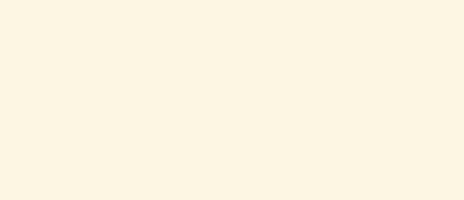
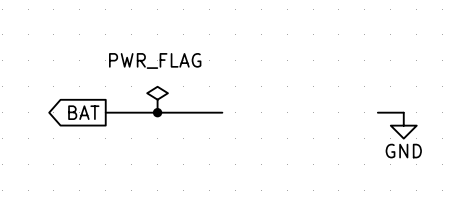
power symbol: none -> PWR_FLAG (157, 99)
global label: none -> BAT (83, 112)
wire: none -> (105, 112) (222, 112)
junction: none -> (157, 112)
wire: none -> (377, 112) (403, 112)
power symbol: none -> GND (403, 125)

